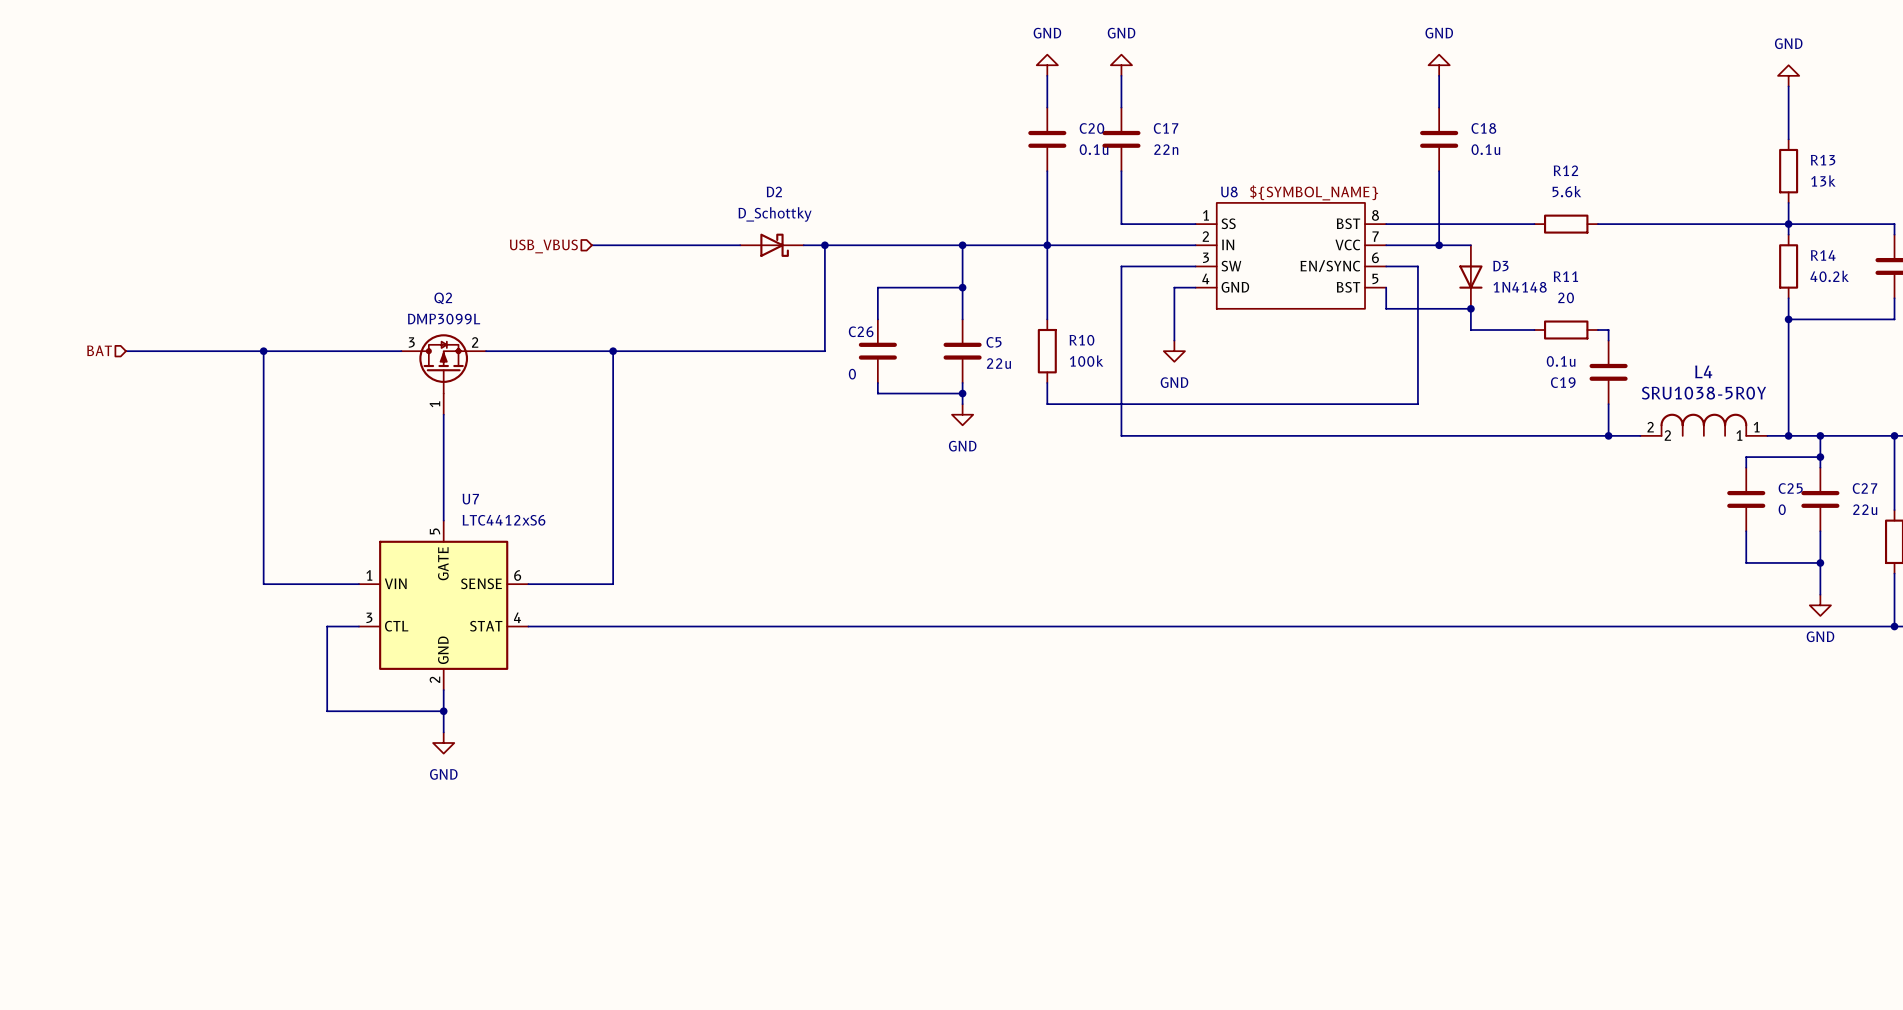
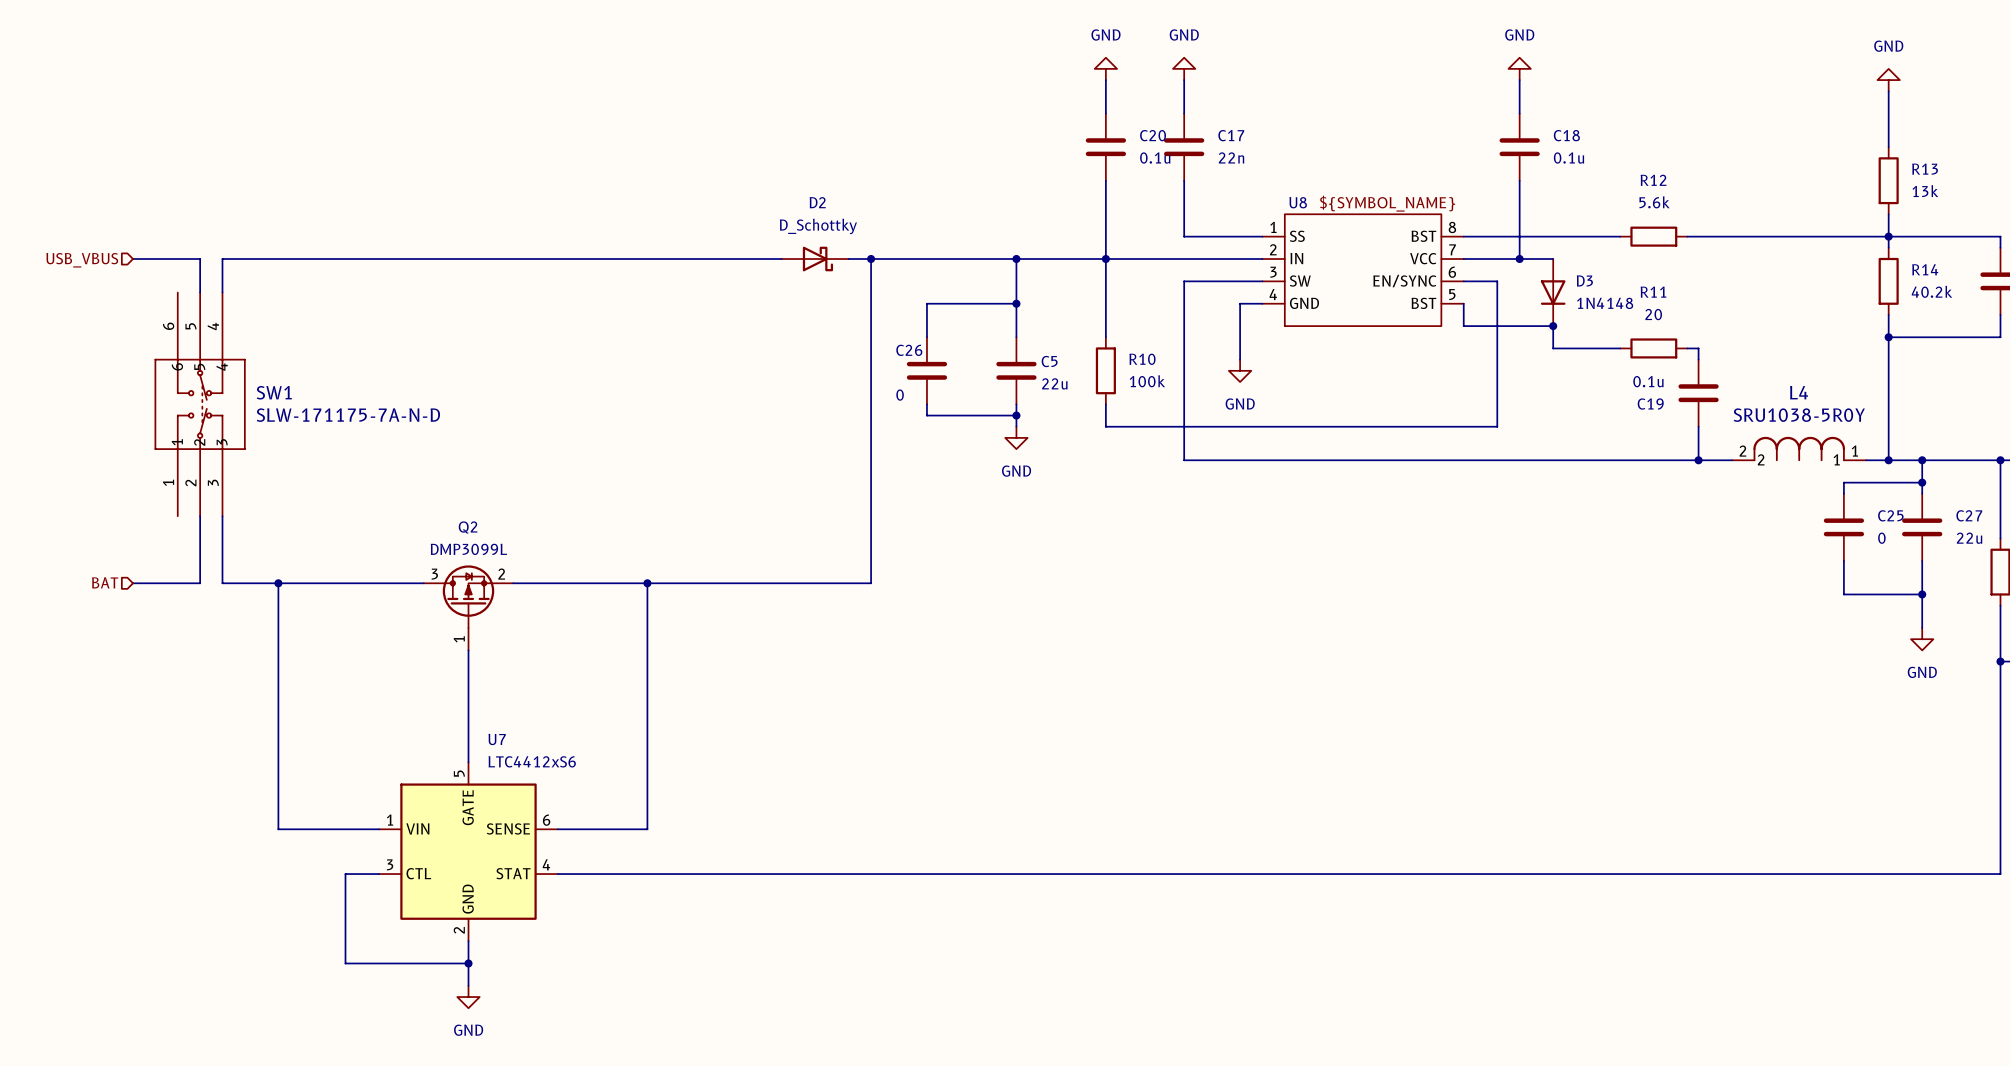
wire: none -> (133, 259) (200, 259) (200, 292)
wire: none -> (625, 259) (222, 259) (222, 292)
hierarchical label: none -> USB_VBUS (82, 260)
hierarchical label: USB_VBUS (543, 246) -> none
hierarchical label position: BAT (99, 350) -> BAT (105, 582)
wire: (125, 351) (401, 351) -> none
wire: (263, 351) (263, 552) -> none
junction: (263, 351) -> none
wire: (486, 351) (824, 351) -> (513, 583) (871, 583) (871, 370)
wire: (613, 351) (613, 552) -> none
junction: (613, 351) -> none
Q2 position: (443, 374) -> (468, 607)
SW1: none -> SLW-171175-7A-N-D (200, 404)
wire: (443, 414) (443, 520) -> none
wire: none -> (200, 516) (200, 583) (133, 583)
wire: none -> (222, 516) (222, 583) (423, 583)
junction: none -> (278, 583)
junction: none -> (647, 583)
wire: (263, 584) (358, 584) -> (278, 616) (278, 829) (379, 829)
wire: (528, 584) (613, 584) -> (557, 829) (647, 829) (647, 616)
U7 position: (443, 605) -> (468, 851)
wire: (358, 626) (327, 626) (327, 711) (443, 711) -> (379, 874) (345, 874) (345, 963) (468, 963)
wire: (528, 626) (1894, 626) -> (557, 874) (2000, 874) (2000, 661)
junction: (443, 711) -> none
power symbol position: GND (443, 743) -> GND (468, 997)
wire: none -> (468, 941) (468, 985)
junction: none -> (468, 963)

